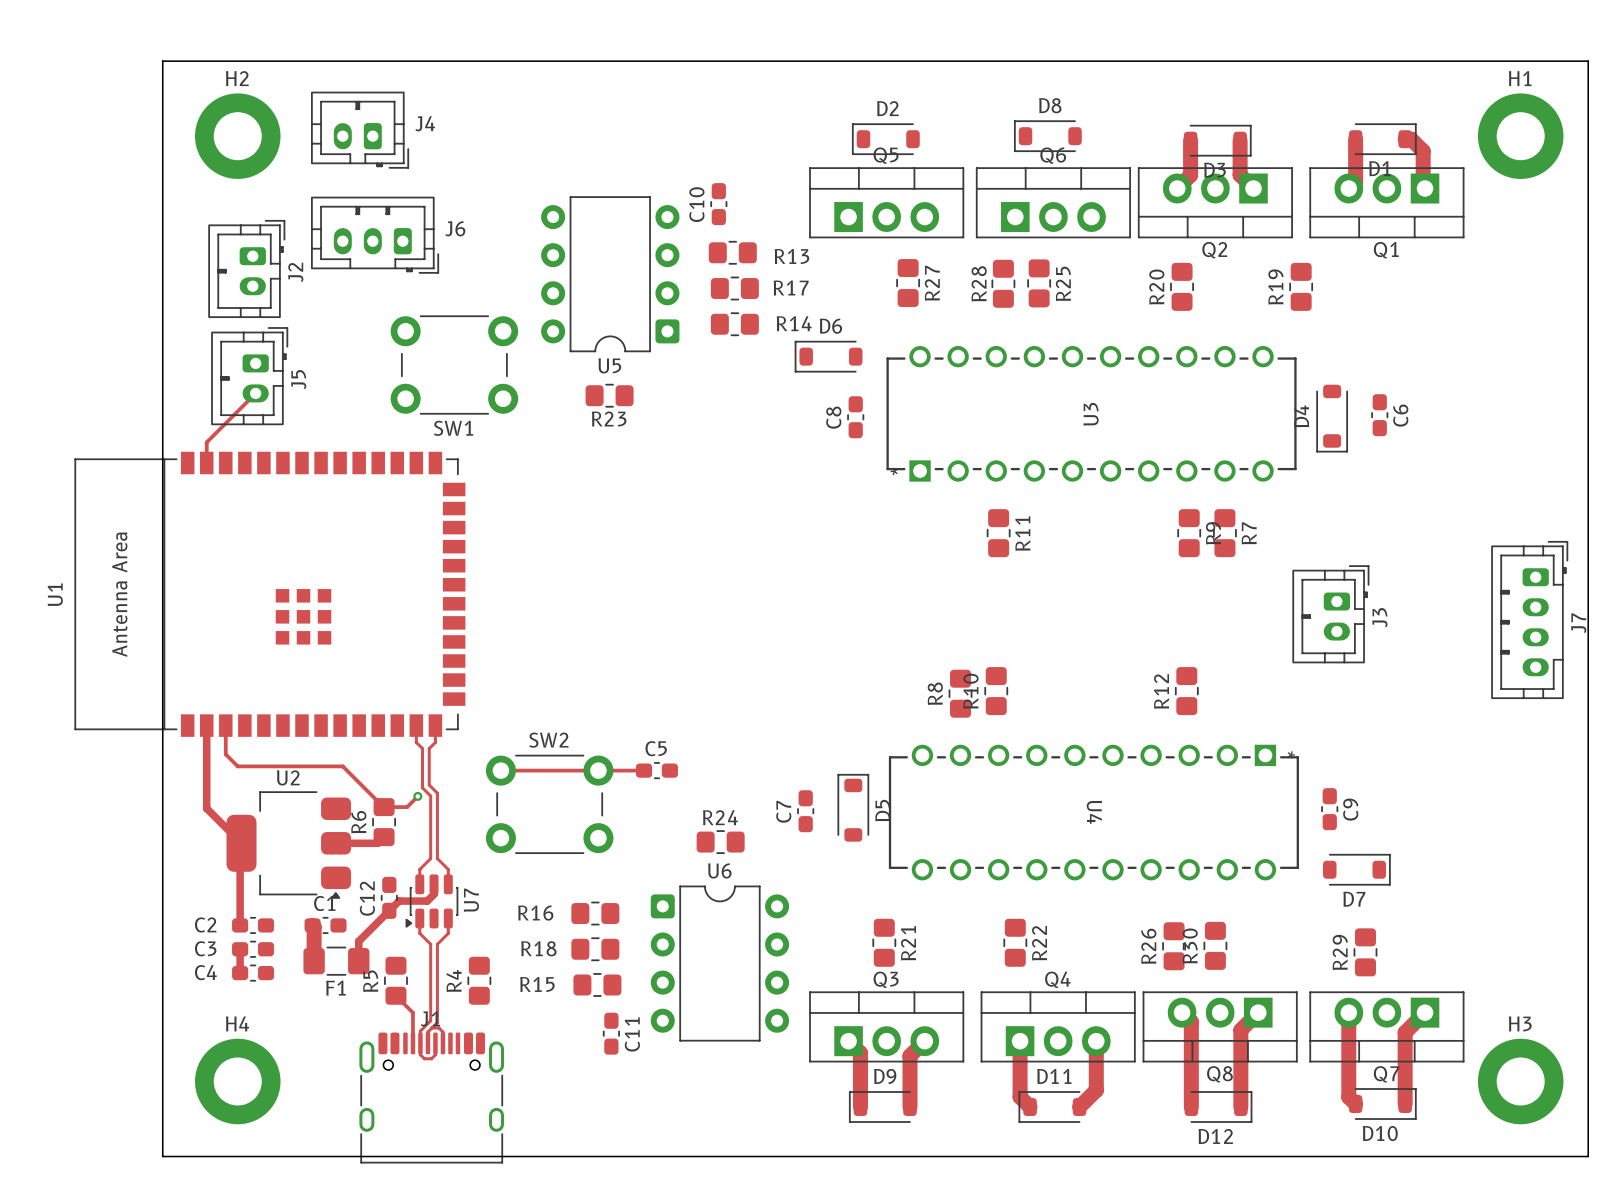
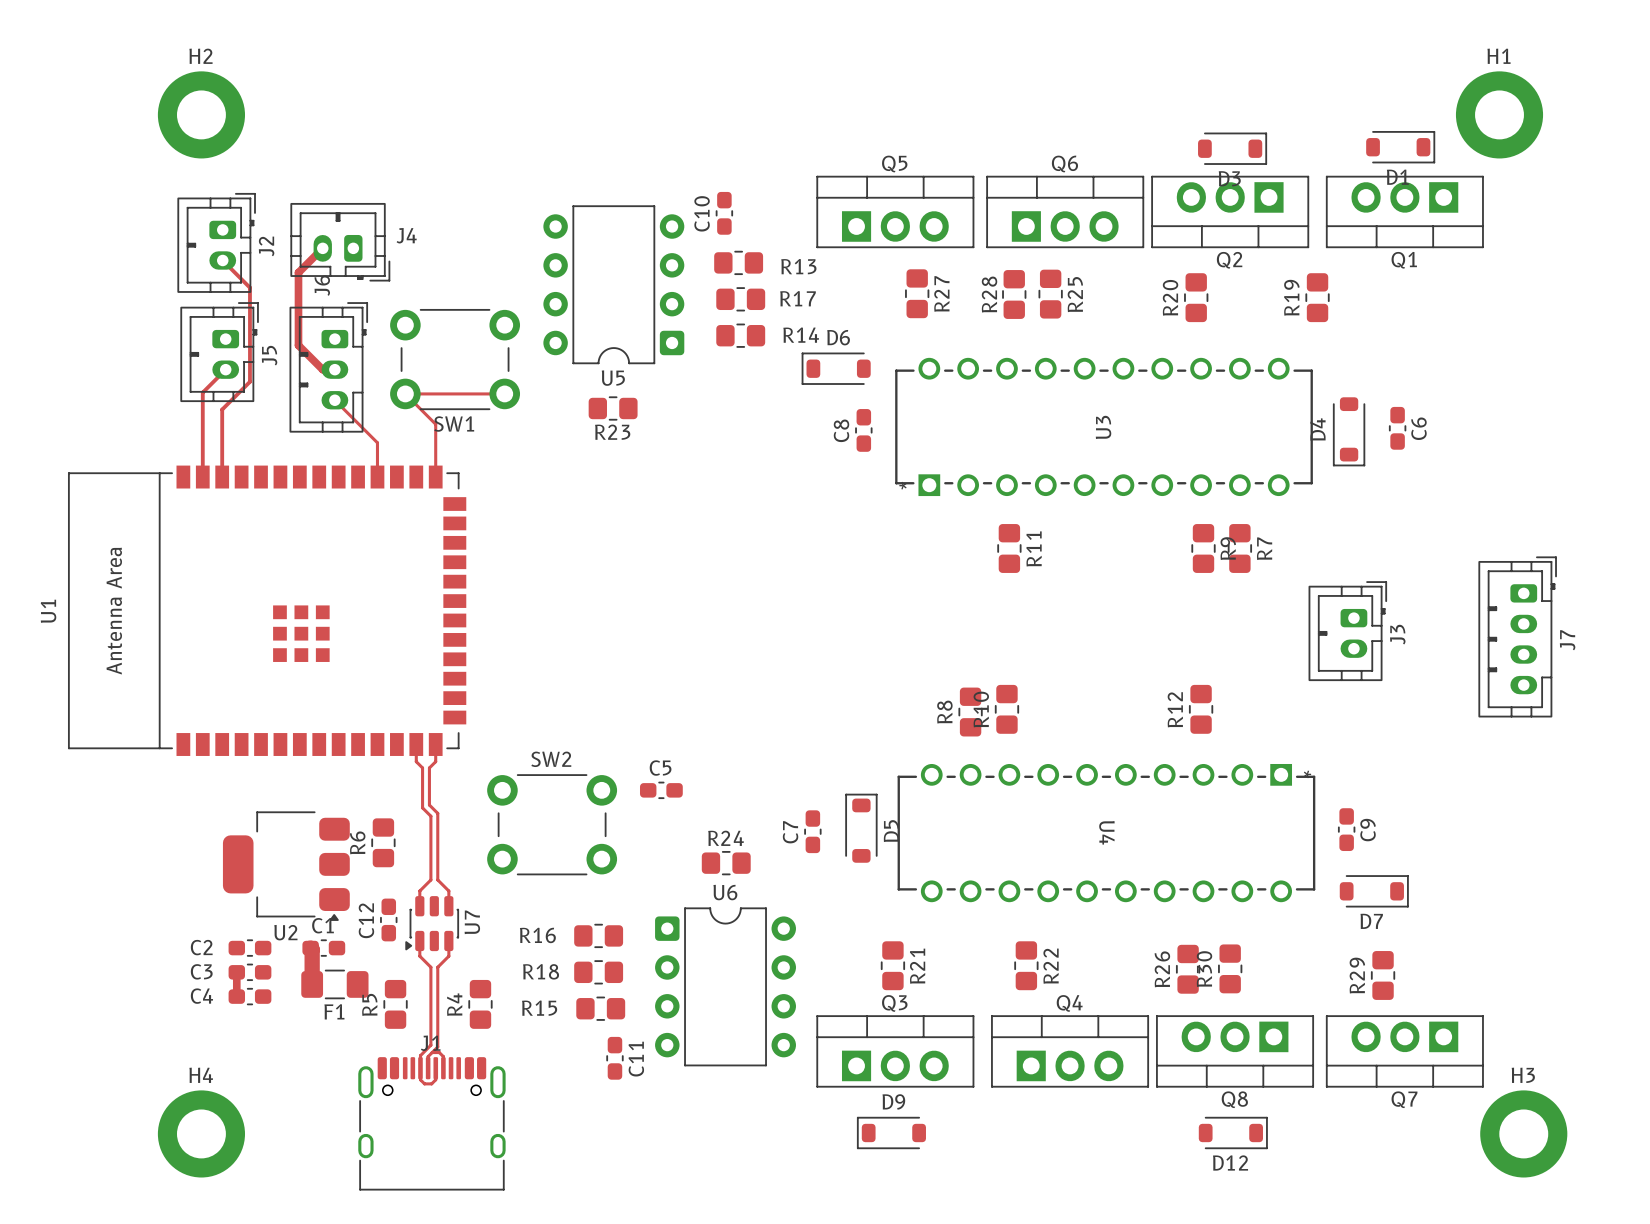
board edge: (162, 61) (1588, 61) (1588, 1156) (162, 1156) (162, 61) -> none
J4 position: (360, 130) -> (340, 242)
H2 position: (237, 136) -> (201, 114)
D8: (1047, 136) -> none
H1 position: (1520, 136) -> (1499, 114)
D2: (885, 139) -> none
track: (1355, 139) (1355, 181) (1348, 188) -> none
track: (1405, 139) (1411, 139) (1423, 151) (1423, 186) (1425, 188) -> none
track: (1190, 140) (1190, 175) (1177, 188) -> none
track: (1240, 140) (1240, 175) (1253, 188) -> none
J2 footprint: [208, 219, 286, 319] -> [177, 192, 256, 293]
J6 rotation: 0° (375, 235) -> 90° counterclockwise (328, 367)
J6 position: (375, 235) -> (328, 367)
track: none -> (322, 248) (298, 272) (298, 345) (322, 369) (334, 369)
track: none -> (222, 260) (249, 287) (249, 381) (222, 409) (222, 477)
SW1 position: (454, 365) -> (455, 359)
J5 position: (249, 376) -> (219, 352)
track: none -> (504, 393) (405, 393) (435, 424) (435, 477)
track: none -> (334, 400) (377, 442) (377, 477)
track: (255, 393) (206, 442) -> (225, 369) (202, 392) (202, 456)
J7 position: (1529, 619) -> (1517, 636)
track: (206, 725) (206, 808) (241, 843) (240, 925) -> none
track: (225, 725) (225, 754) (237, 766) (342, 766) (383, 807) (407, 807) (417, 796) -> none
track: (500, 770) (644, 770) -> none
U2 name position: U2 (288, 777) -> U2 (285, 932)
via: (417, 796) -> none
track: (384, 837) (377, 843) (336, 843) -> none
track: (434, 884) (434, 894) (427, 901) (399, 901) (358, 941) (358, 961) -> none
track: (395, 995) (412, 1012) (412, 1043) -> none
track: (1182, 1012) (1191, 1021) (1191, 1107) -> none
track: (1258, 1012) (1240, 1030) (1240, 1107) -> none
track: (1348, 1012) (1348, 1097) (1355, 1104) -> none
track: (1425, 1012) (1405, 1032) (1405, 1104) -> none
track: (848, 1041) (860, 1053) (860, 1107) -> none
track: (924, 1041) (909, 1055) (909, 1107) -> none
track: (1020, 1041) (1020, 1097) (1030, 1107) -> none
track: (1096, 1041) (1096, 1090) (1079, 1107) -> none
H4 position: (237, 1081) -> (201, 1133)
H3 position: (1520, 1081) -> (1523, 1133)
D10: (1382, 1104) -> none
D11: (1052, 1107) -> none

